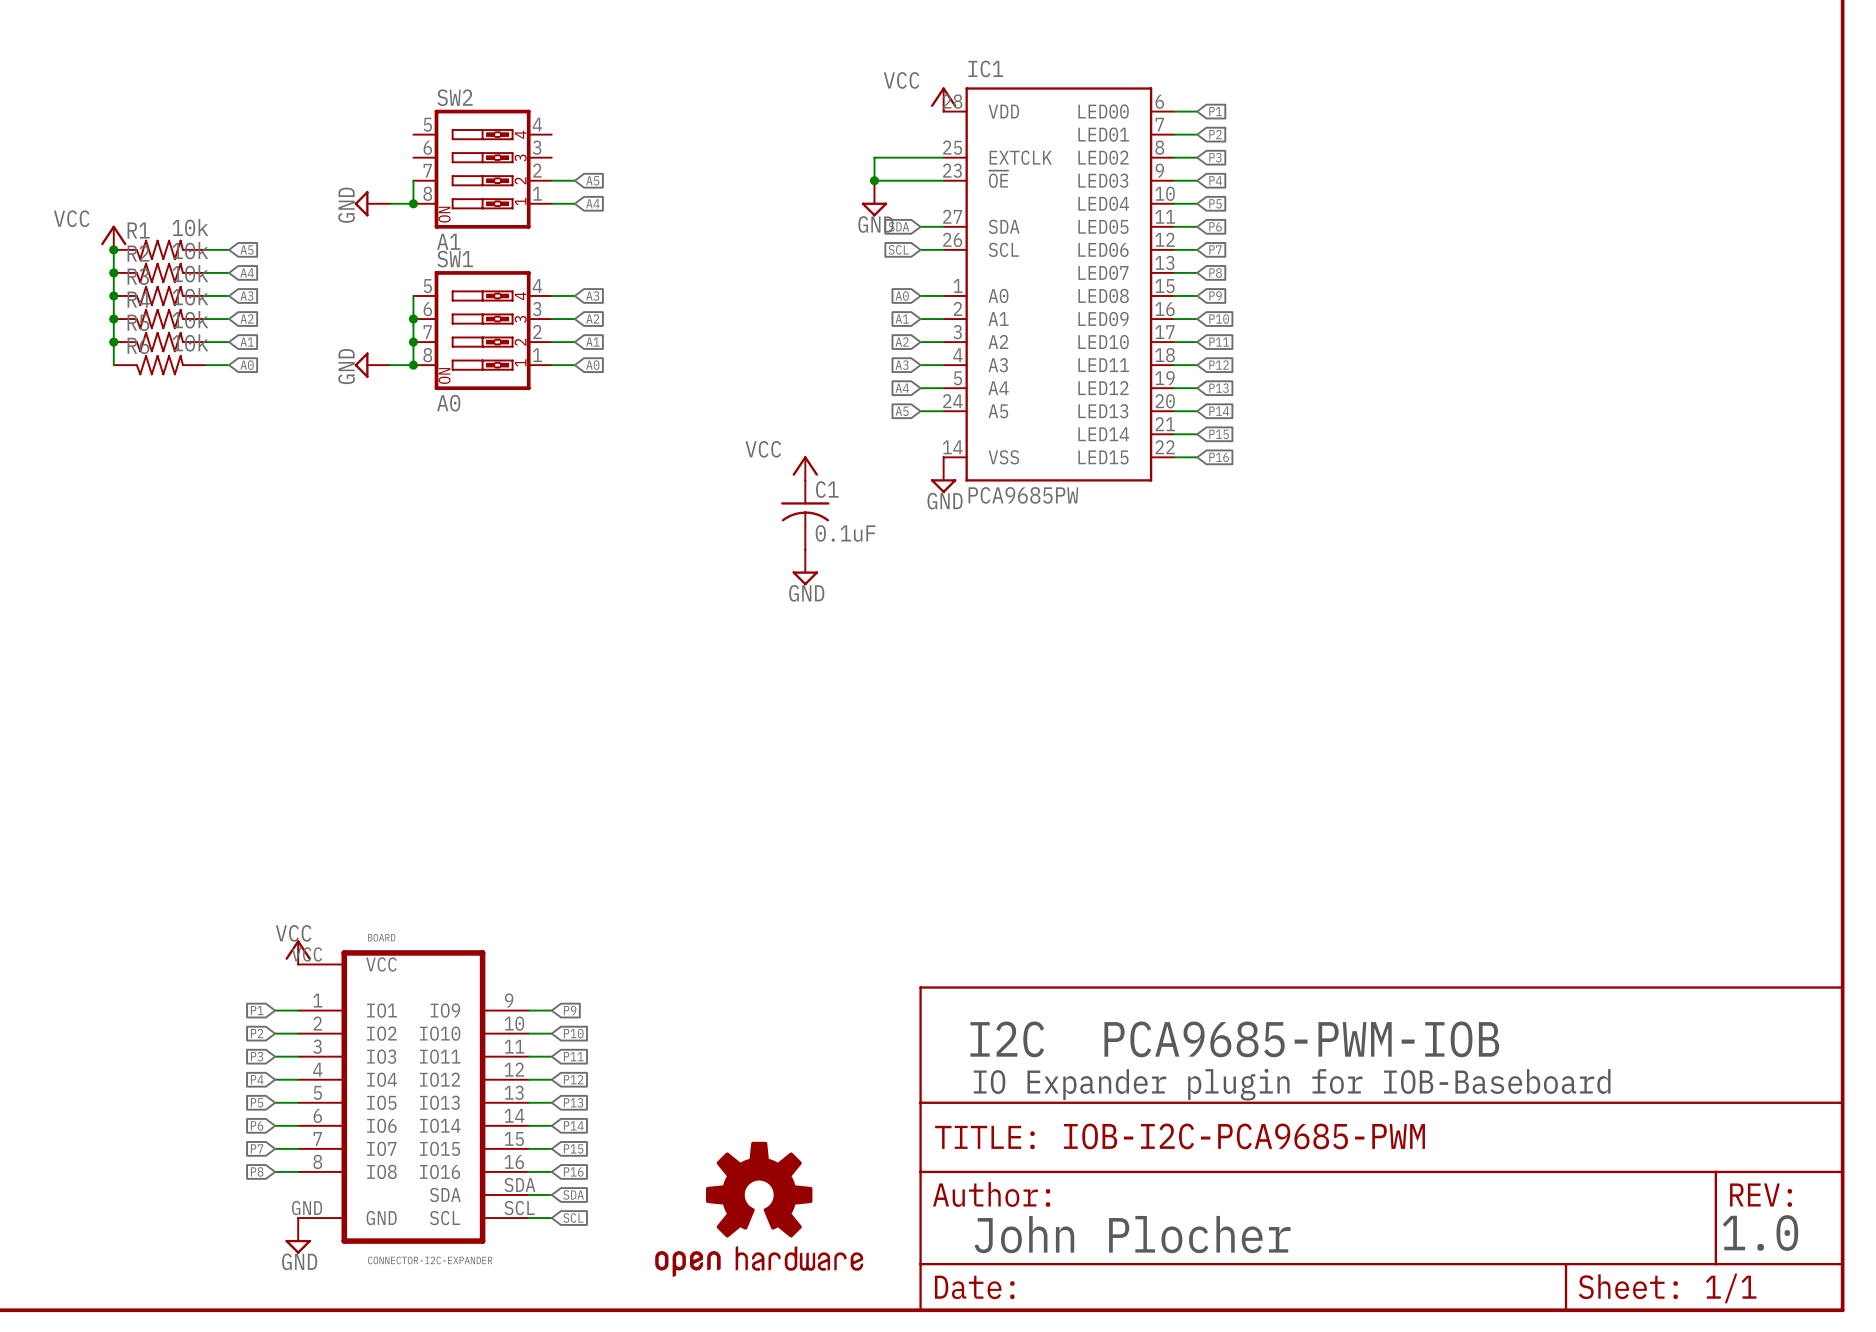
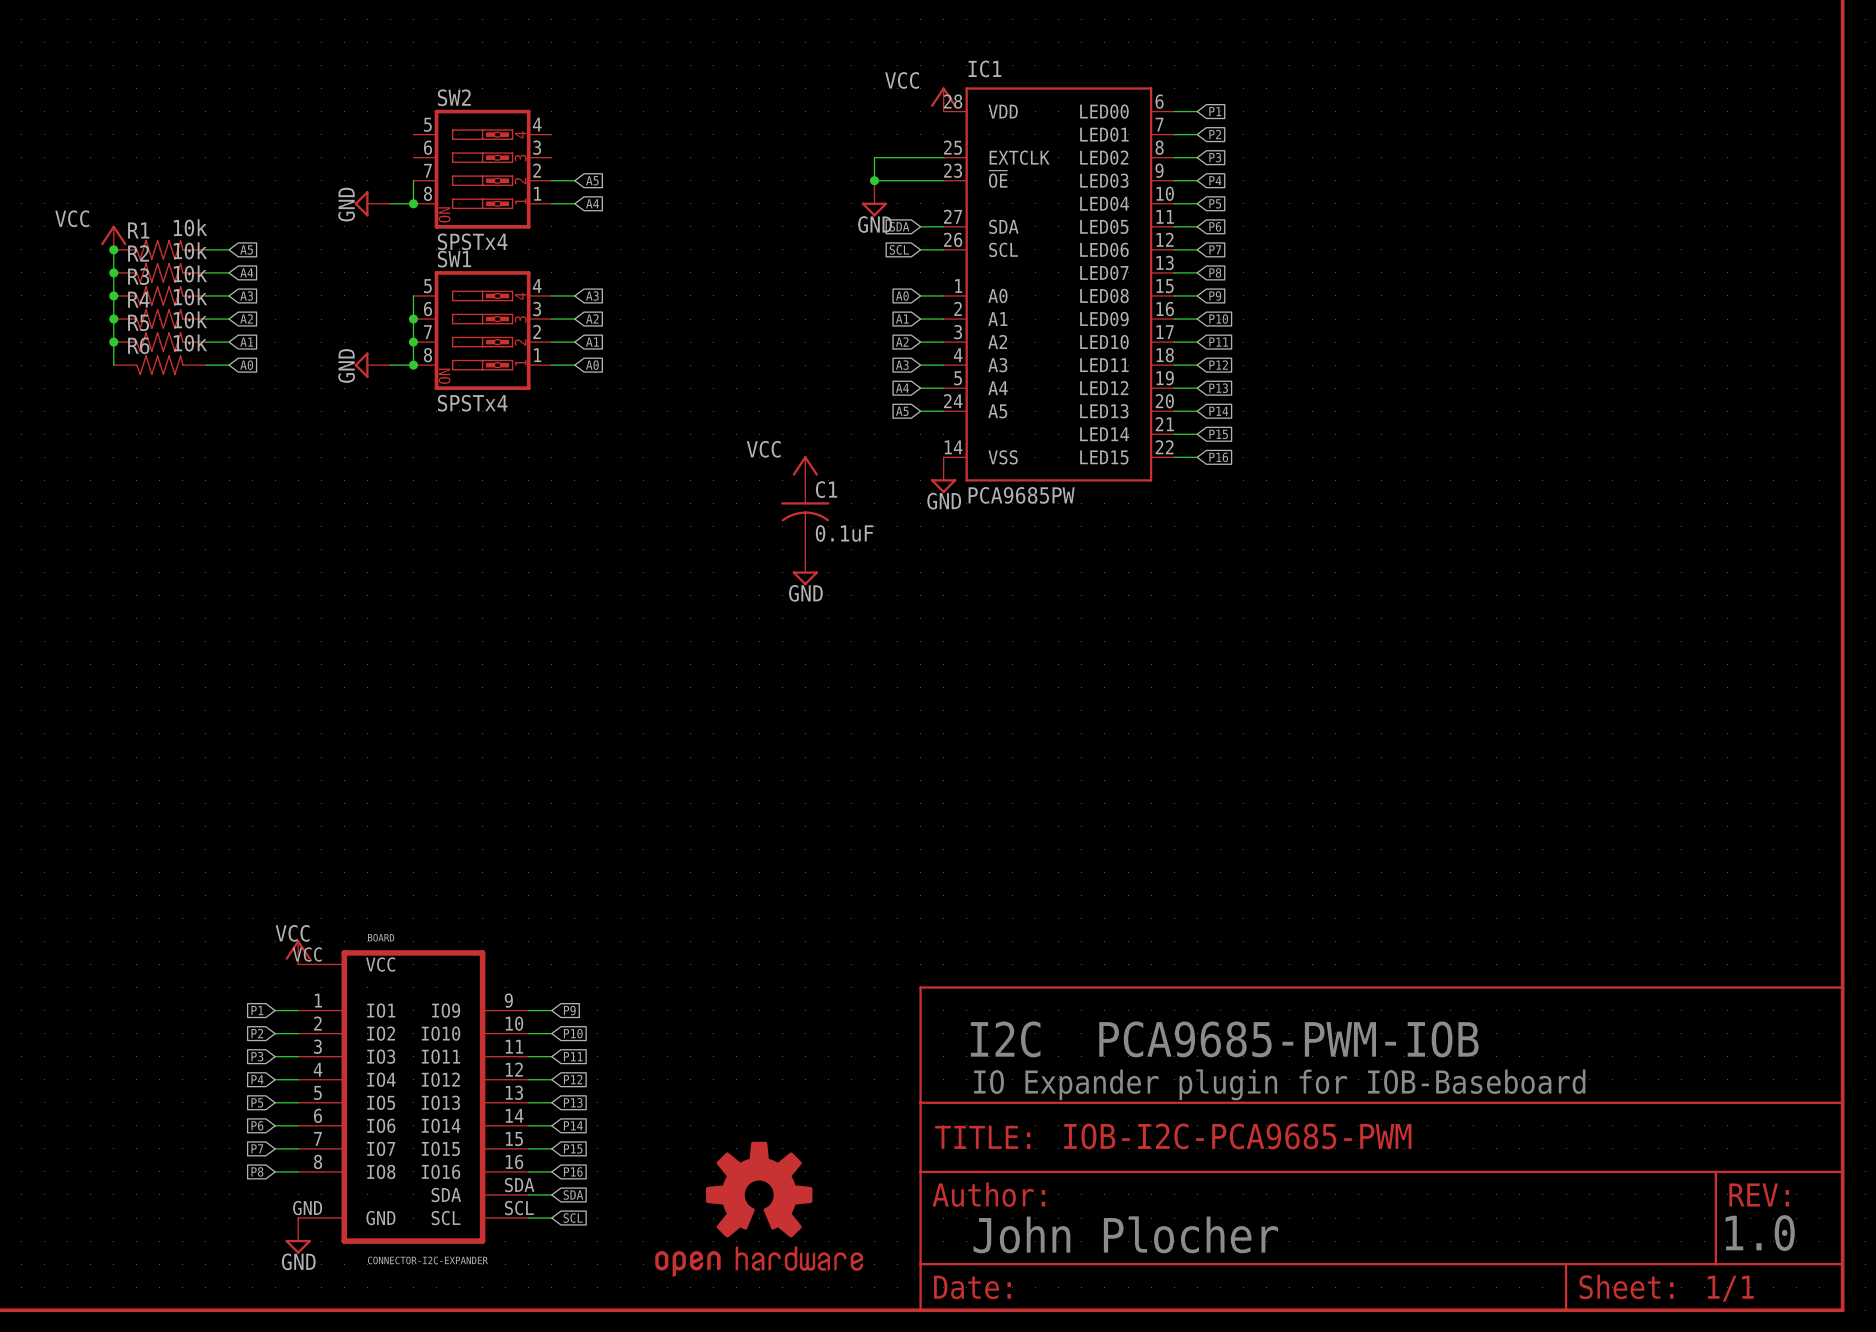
SW2 value: A1 (448, 241) -> SPSTx4 (472, 241)
SW1 value: A0 (448, 403) -> SPSTx4 (472, 403)

